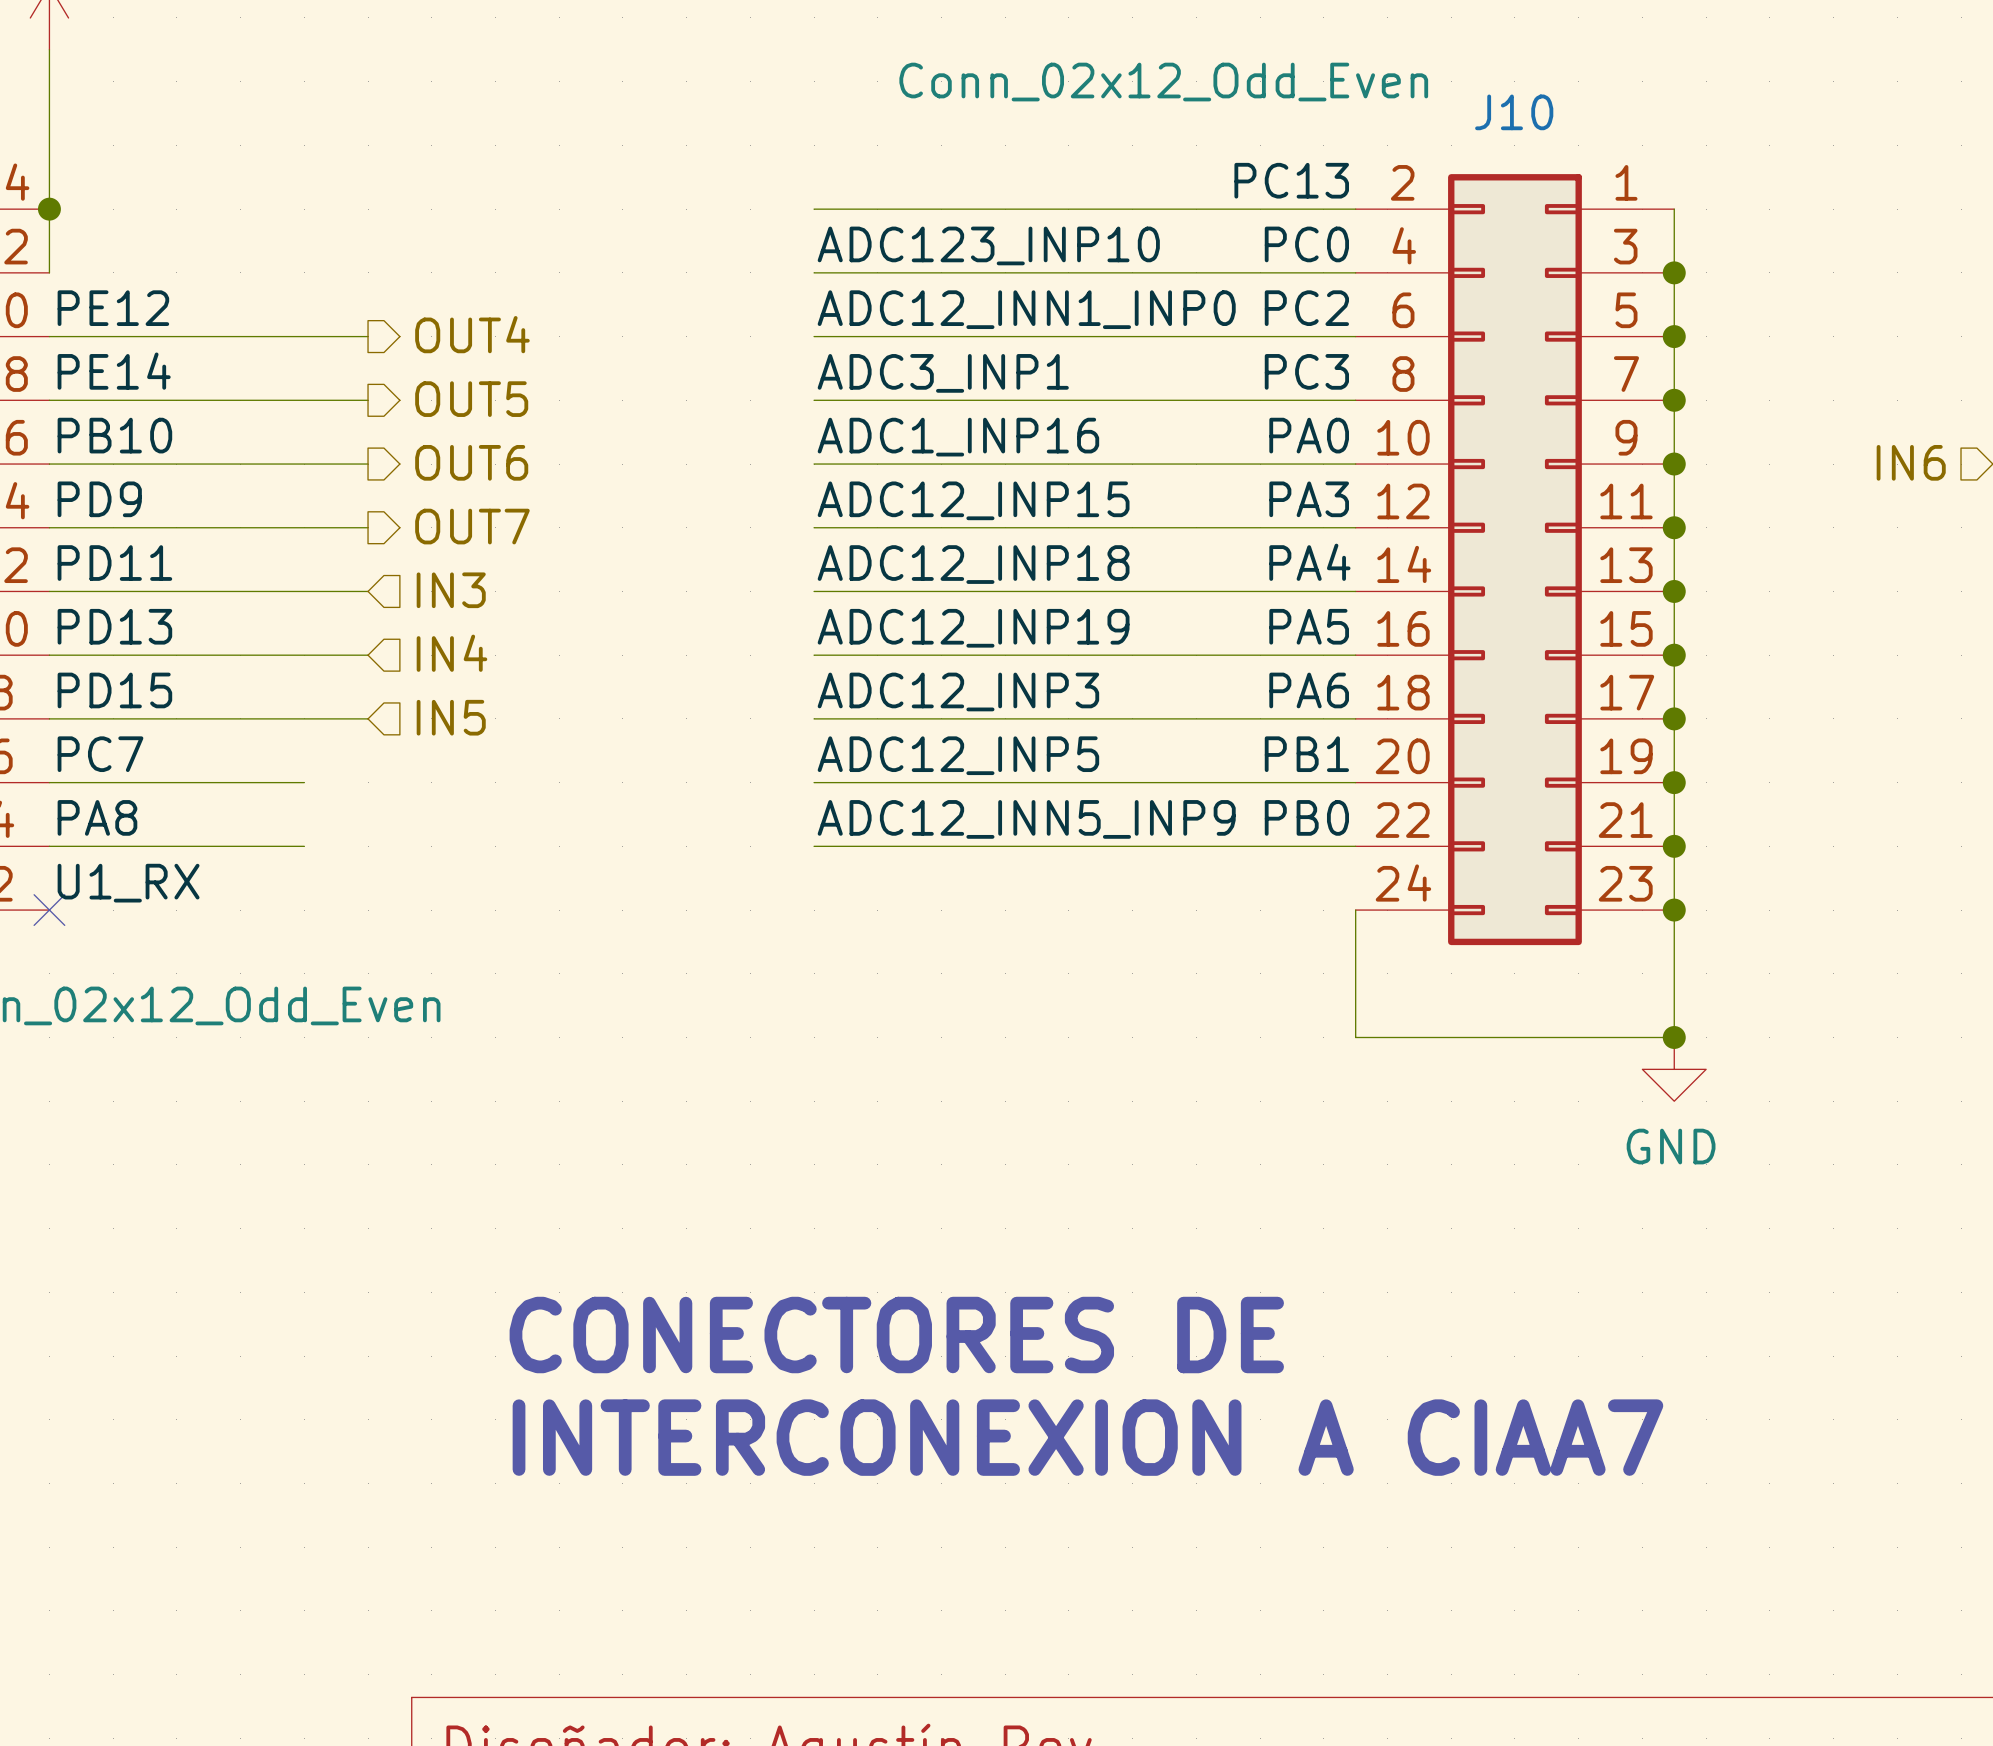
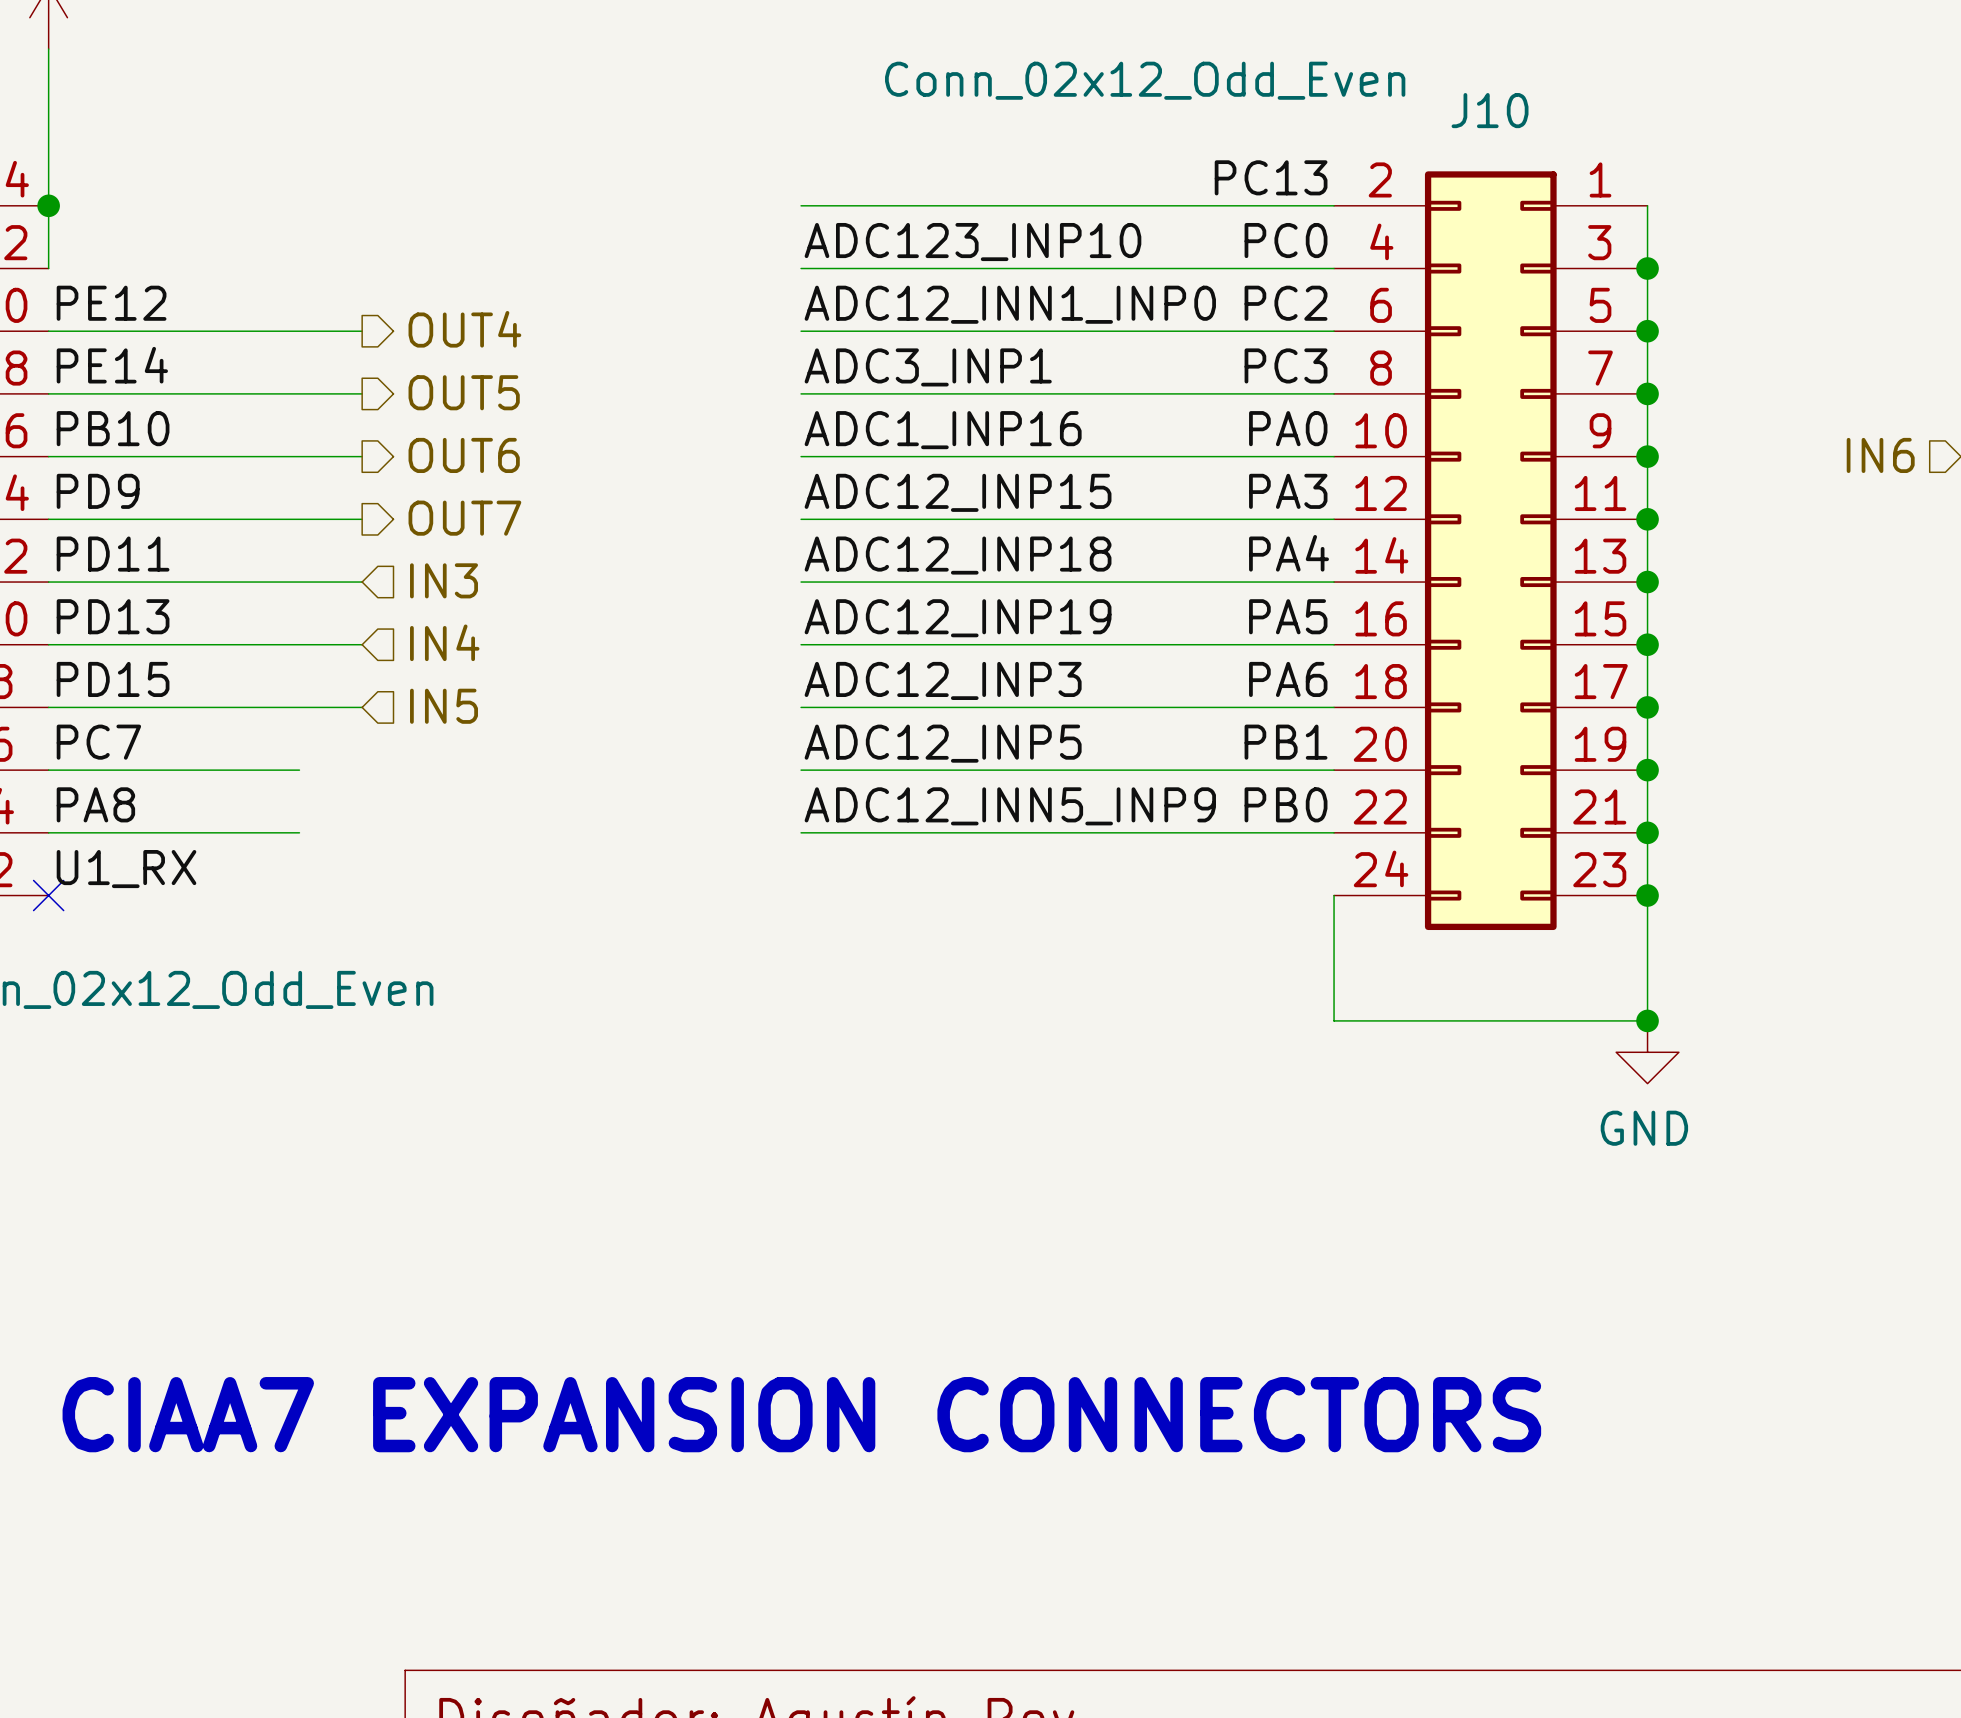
text: CONECTORES DE (896, 1335) -> none
text: none -> CIAA7 EXPANSION CONNECTORS (801, 1414)
text: INTERCONEXION A CIAA7 (1087, 1437) -> none

